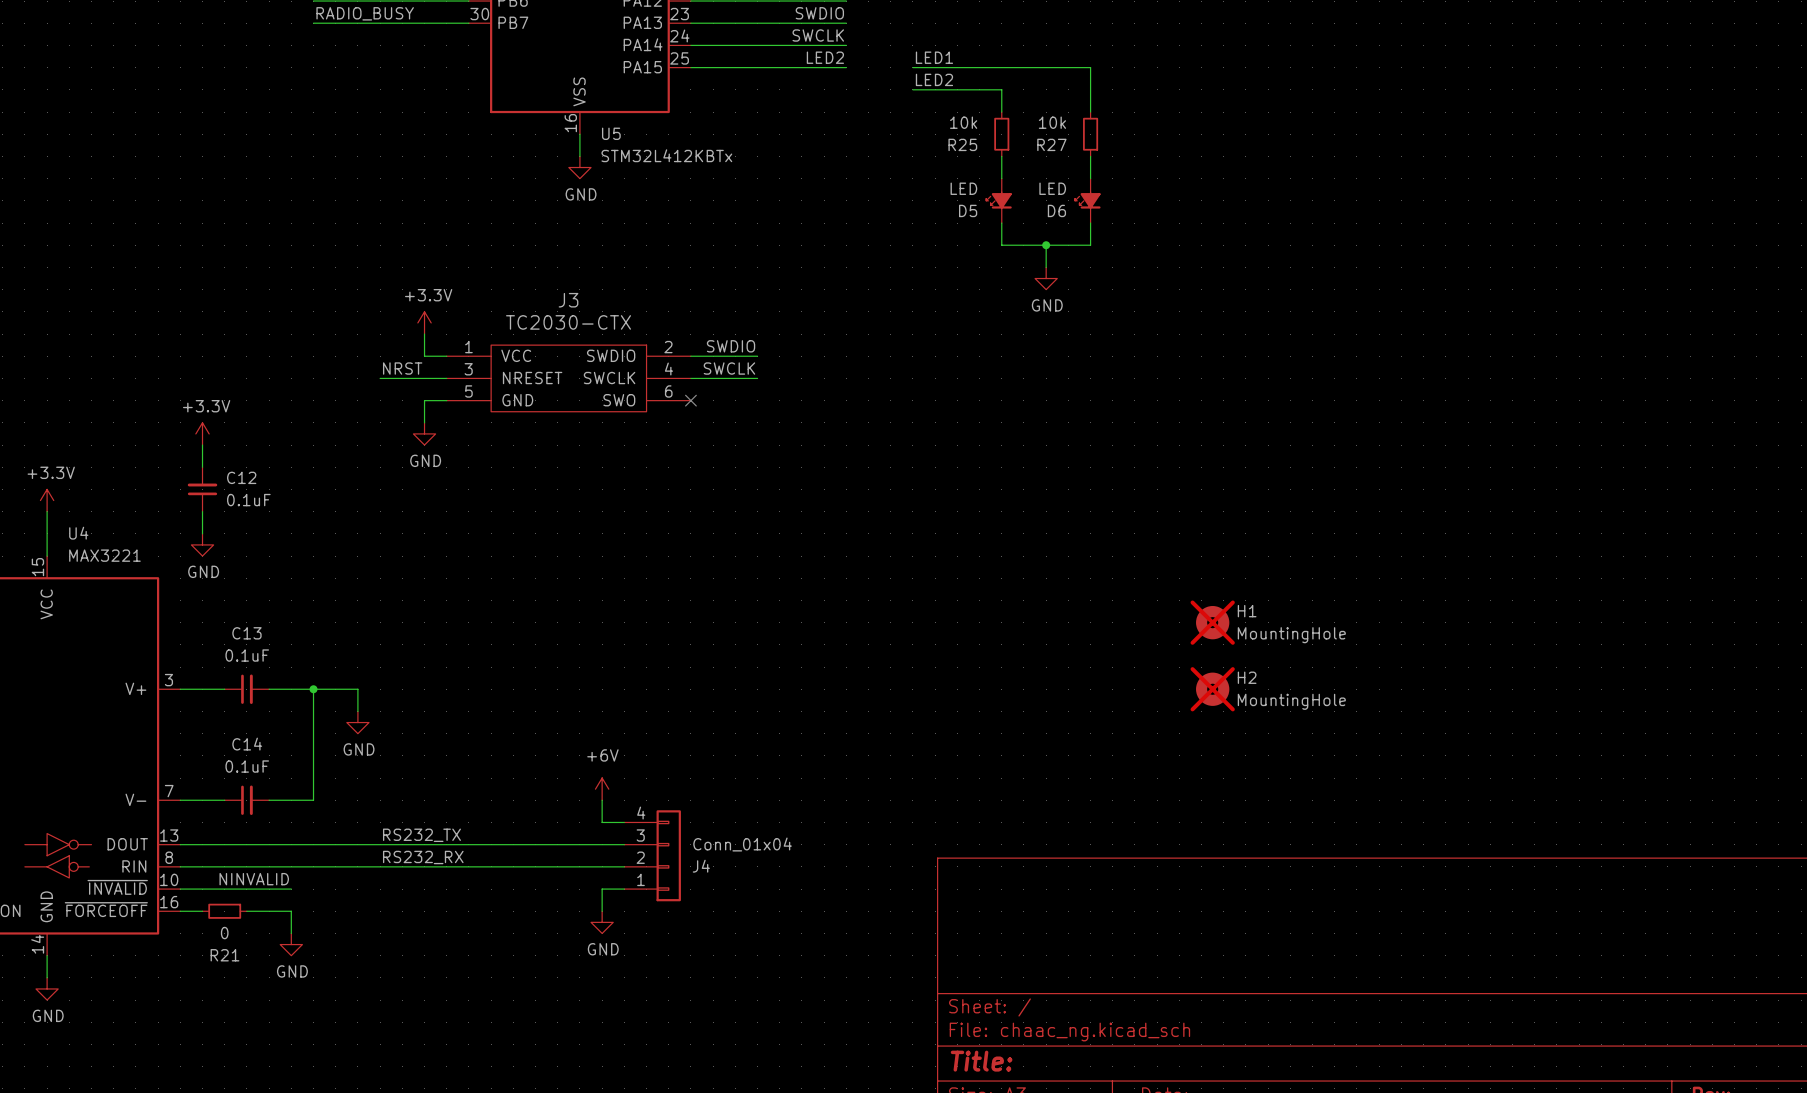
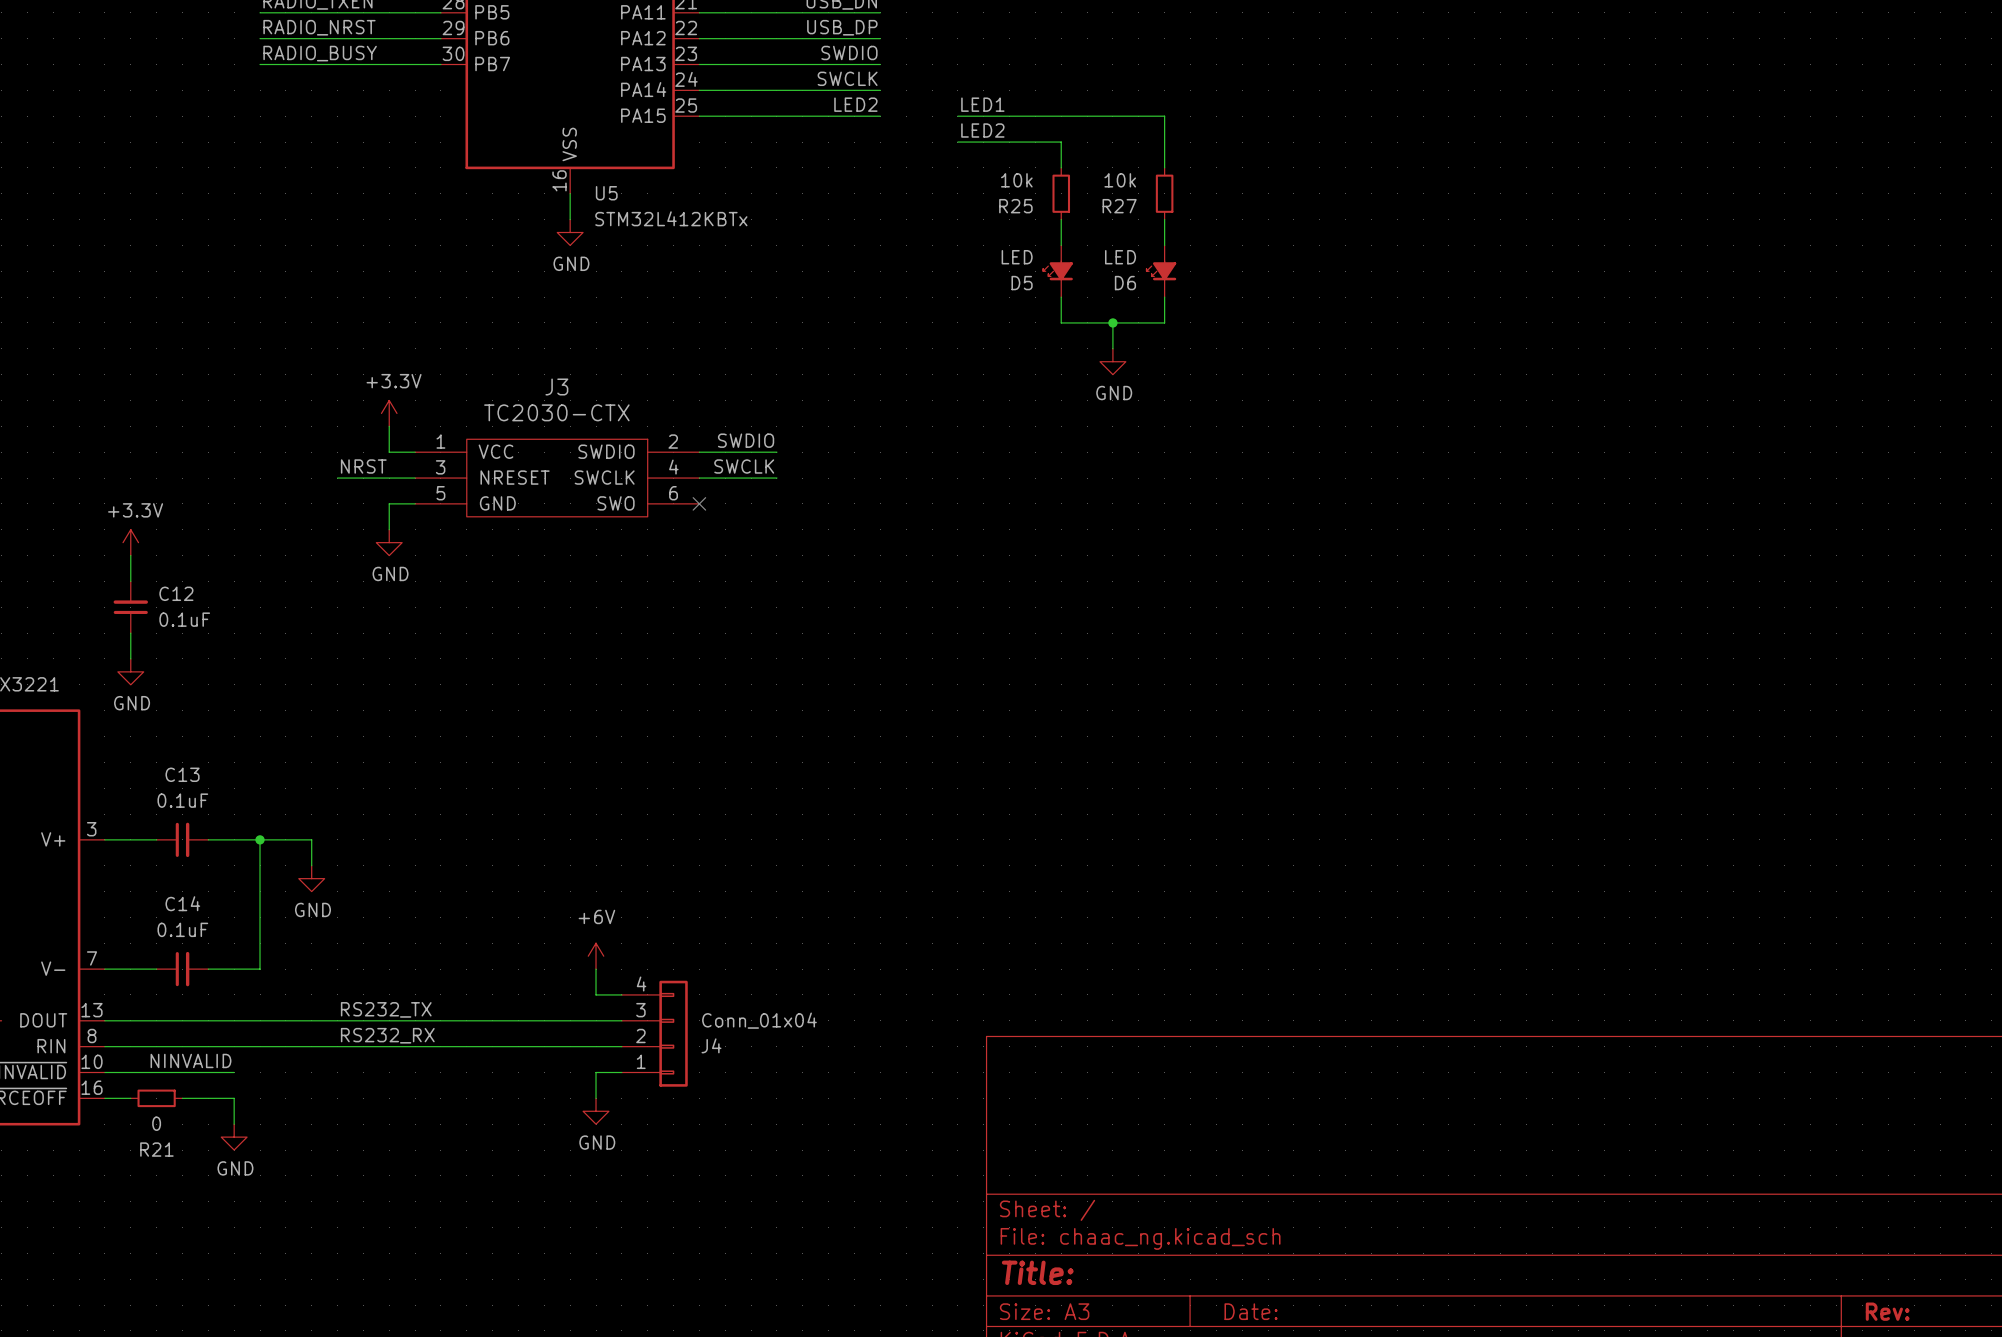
H1: MountingHole (1212, 622) -> none
H2: MountingHole (1212, 689) -> none

